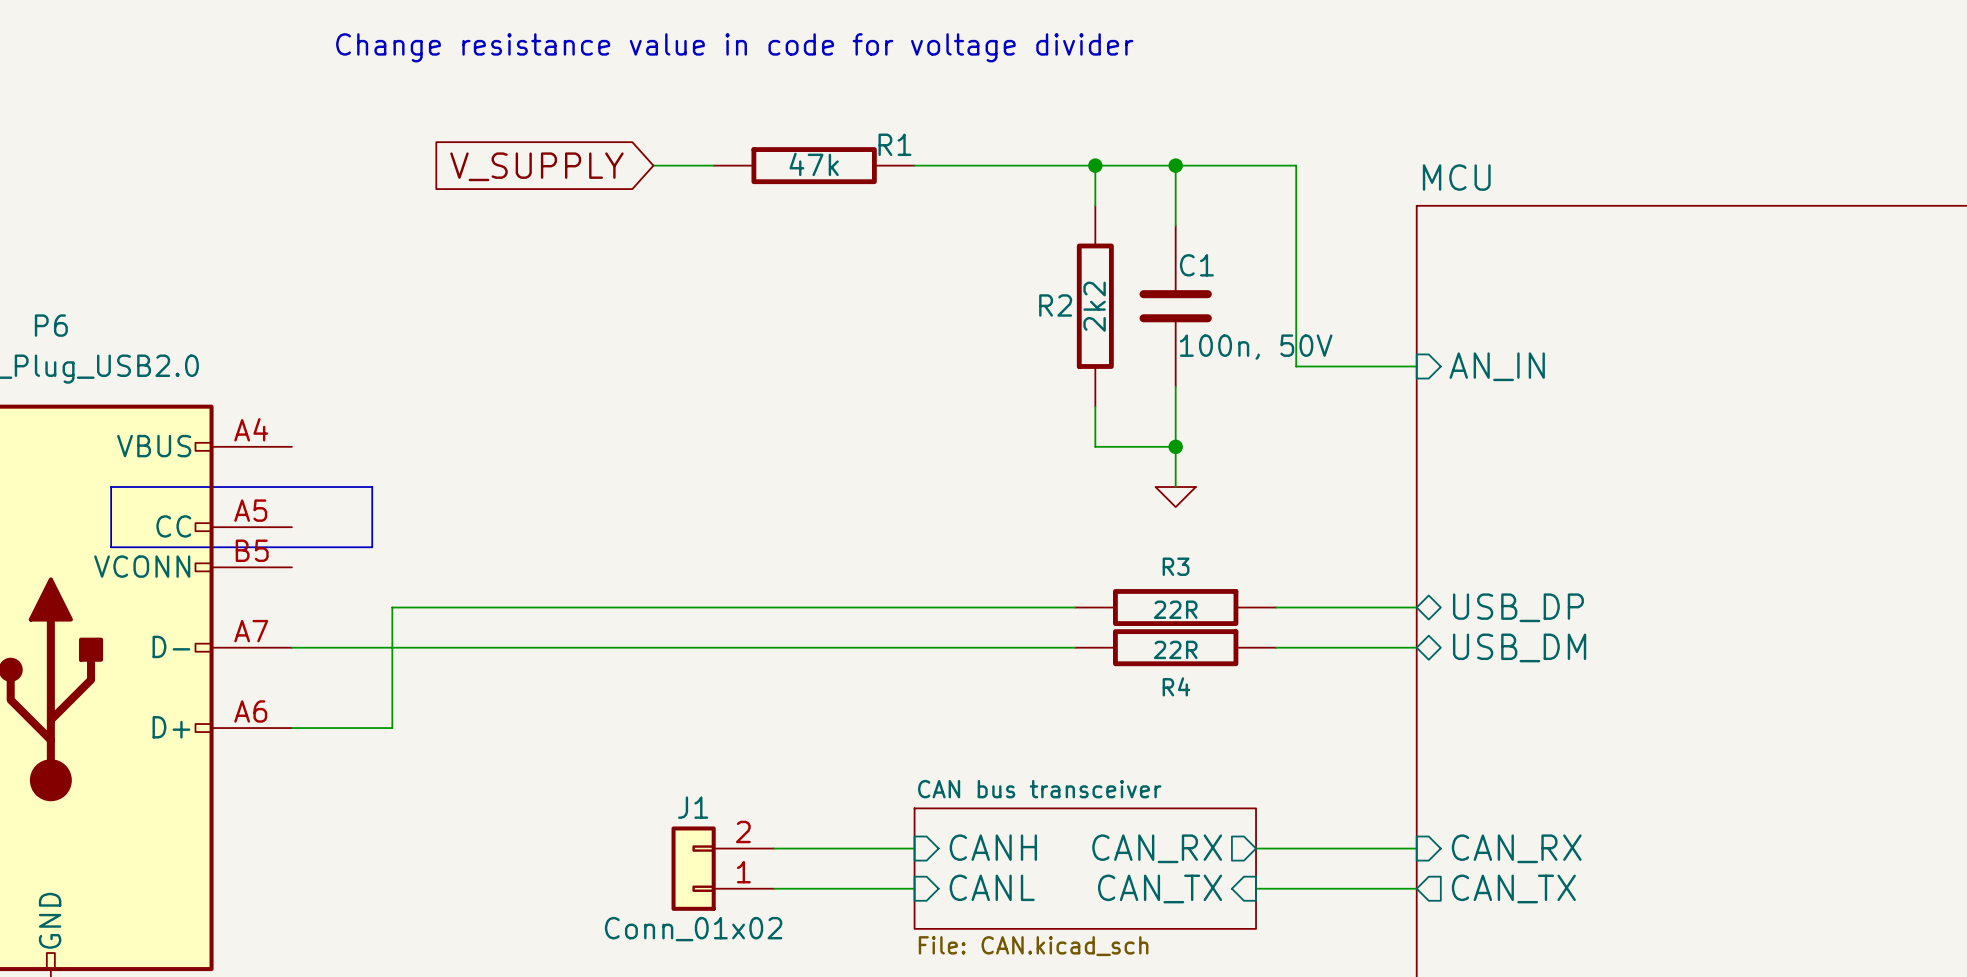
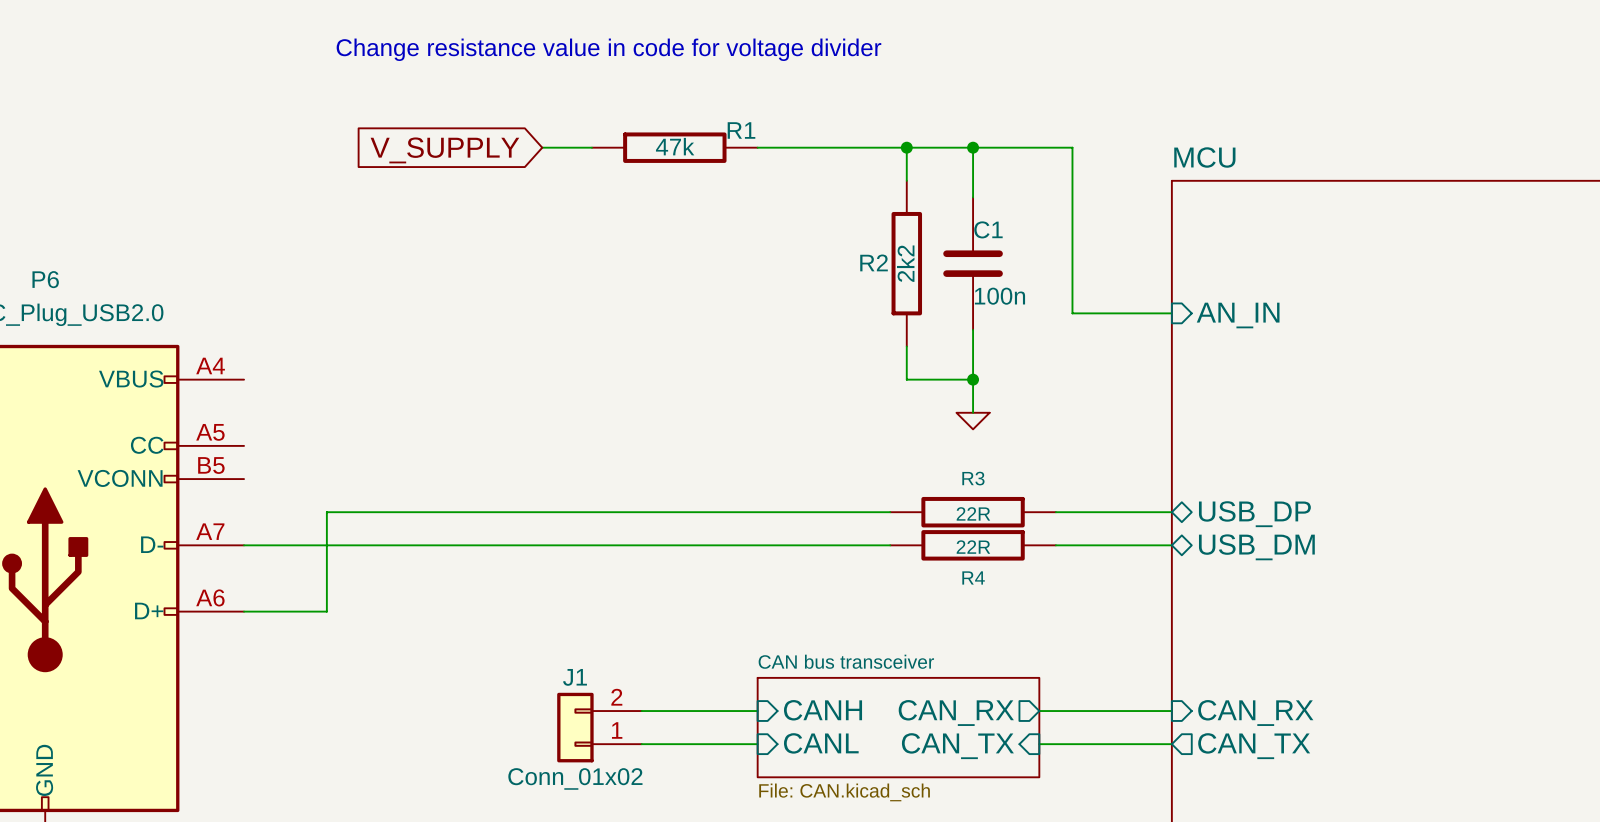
C1 value: 100n, 50V (1256, 347) -> 100n (999, 296)
line: (111, 487) (372, 487) (372, 547) (111, 547) (111, 487) -> none

